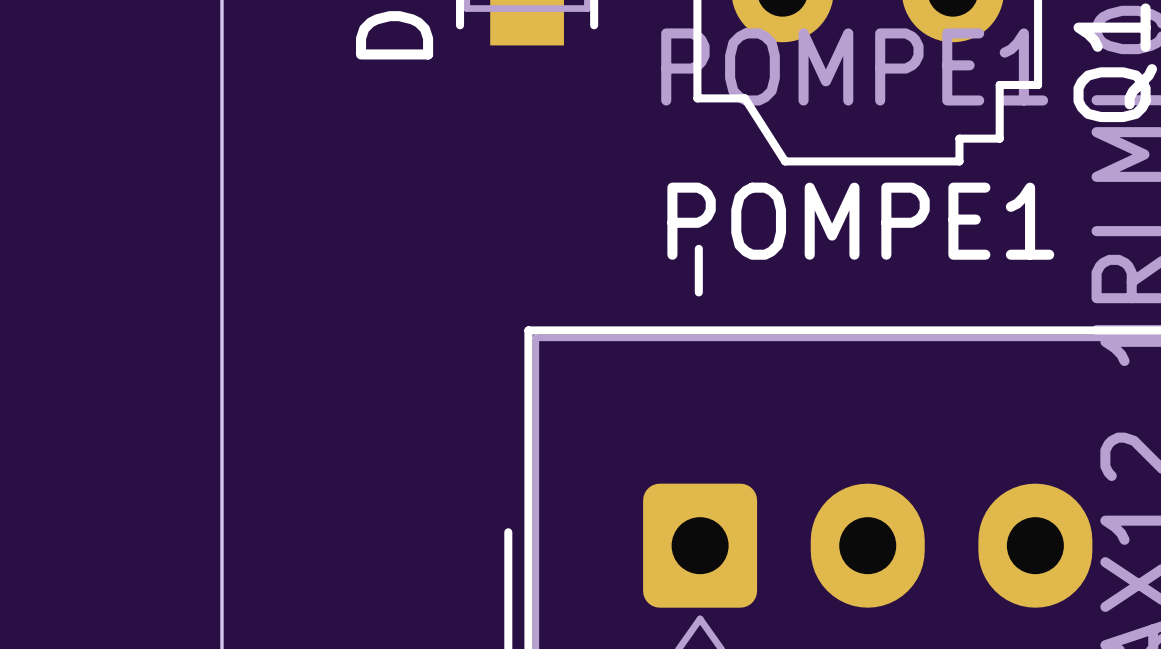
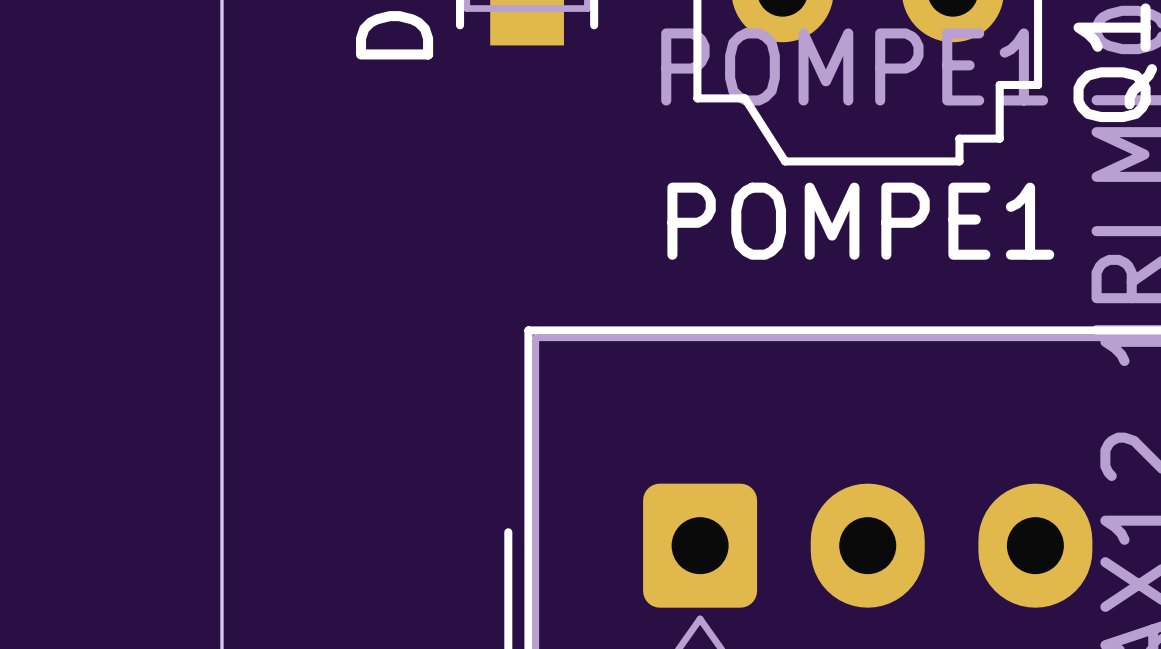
line: (698, 248) (698, 292) -> none

